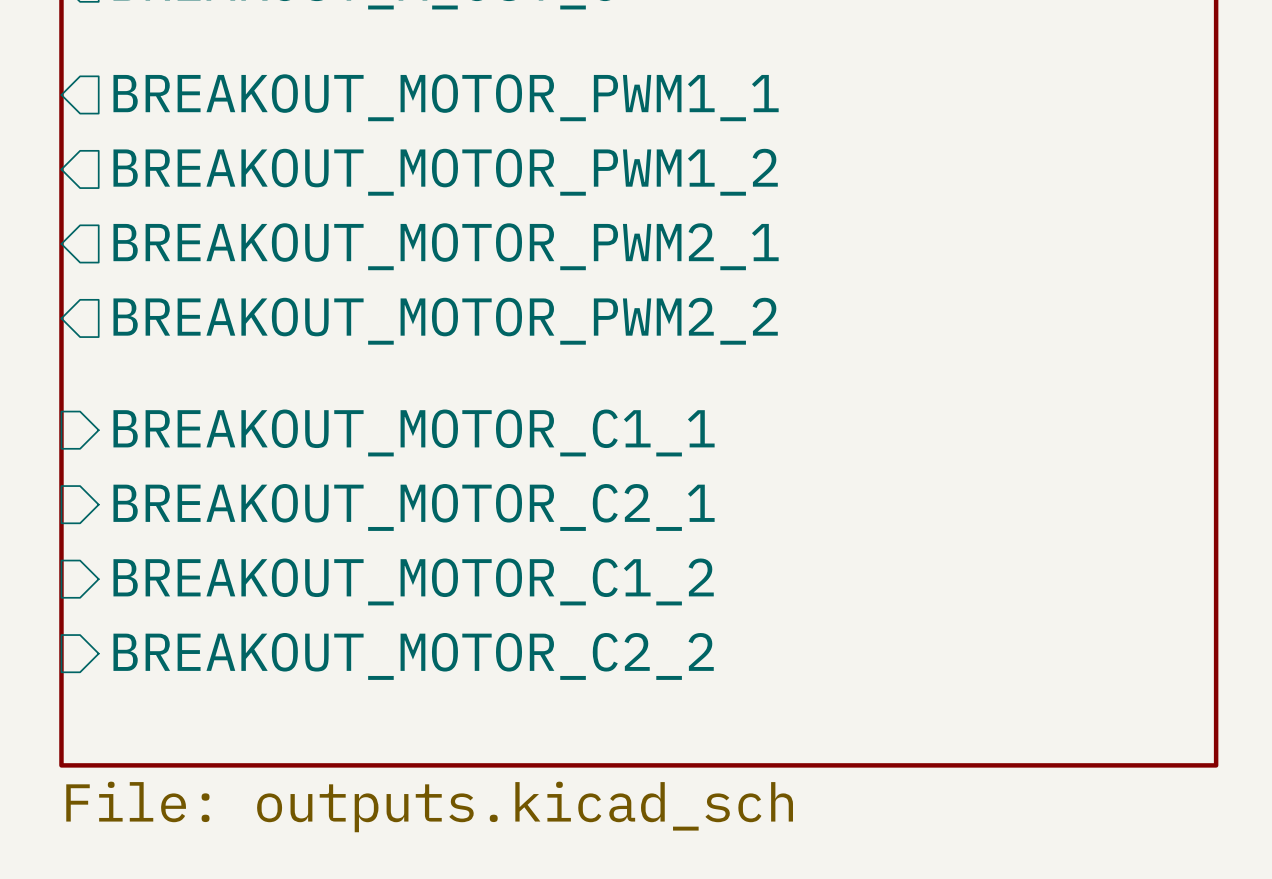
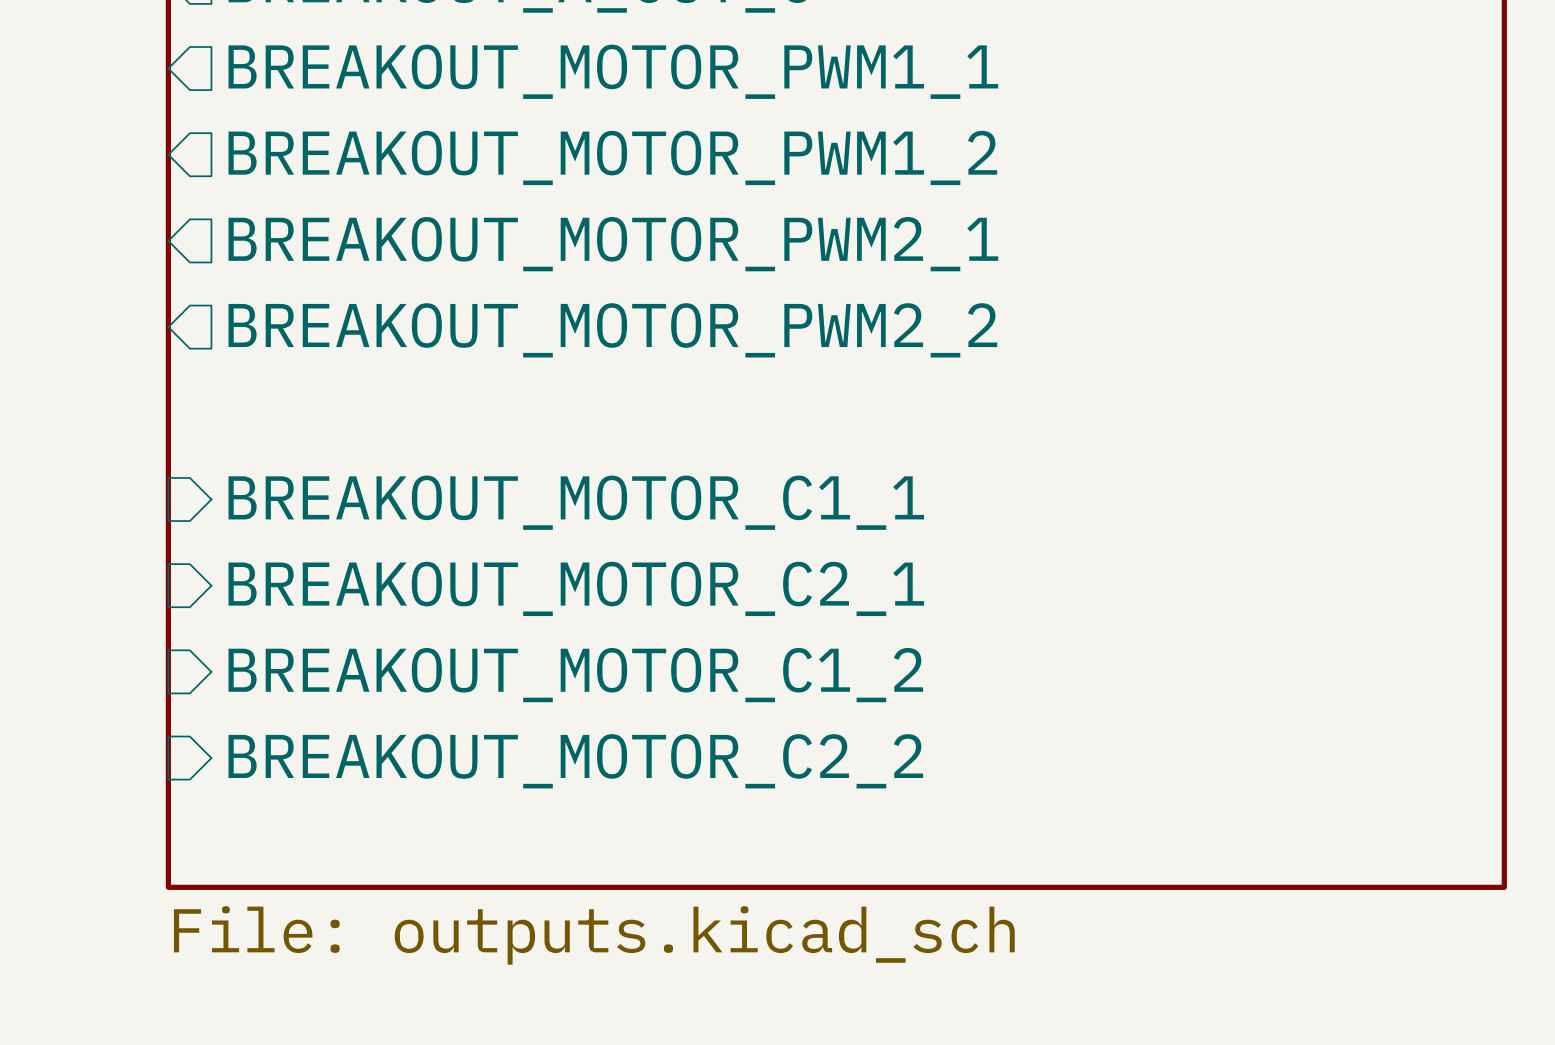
sheet pin position: BREAKOUT_MOTOR_PWM1_1 (446, 97) -> BREAKOUT_MOTOR_PWM1_1 (613, 71)
sheet pin position: BREAKOUT_MOTOR_PWM1_2 (445, 172) -> BREAKOUT_MOTOR_PWM1_2 (612, 157)
sheet pin position: BREAKOUT_MOTOR_PWM2_1 (446, 246) -> BREAKOUT_MOTOR_PWM2_1 (613, 244)
sheet pin position: BREAKOUT_MOTOR_PWM2_2 (445, 321) -> BREAKOUT_MOTOR_PWM2_2 (612, 330)

